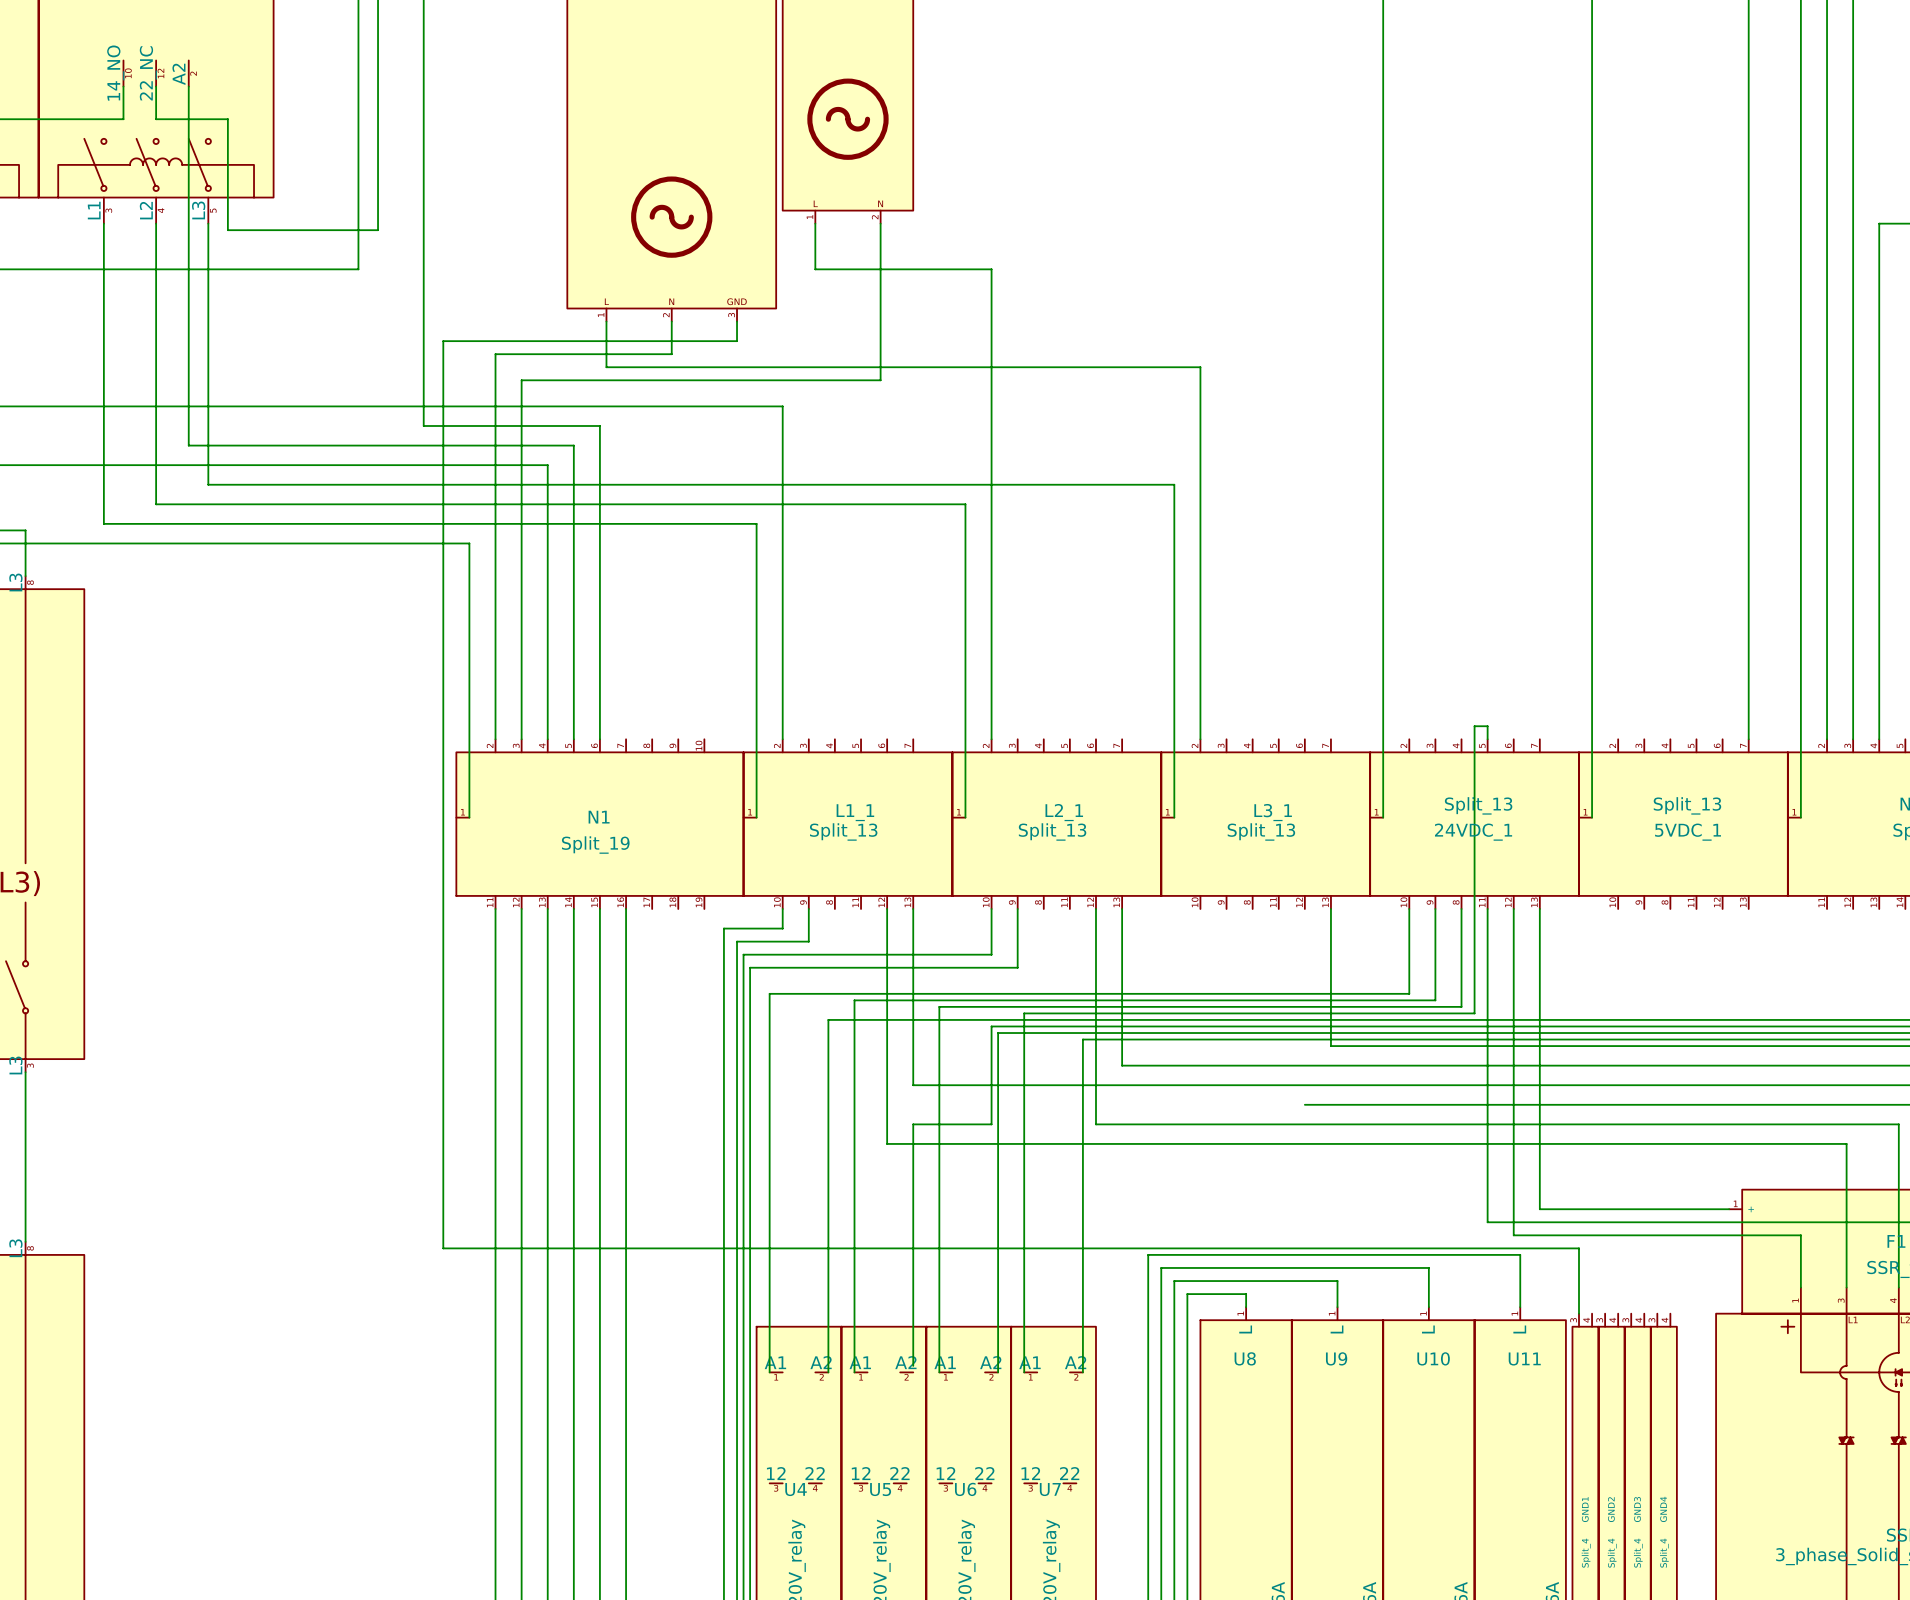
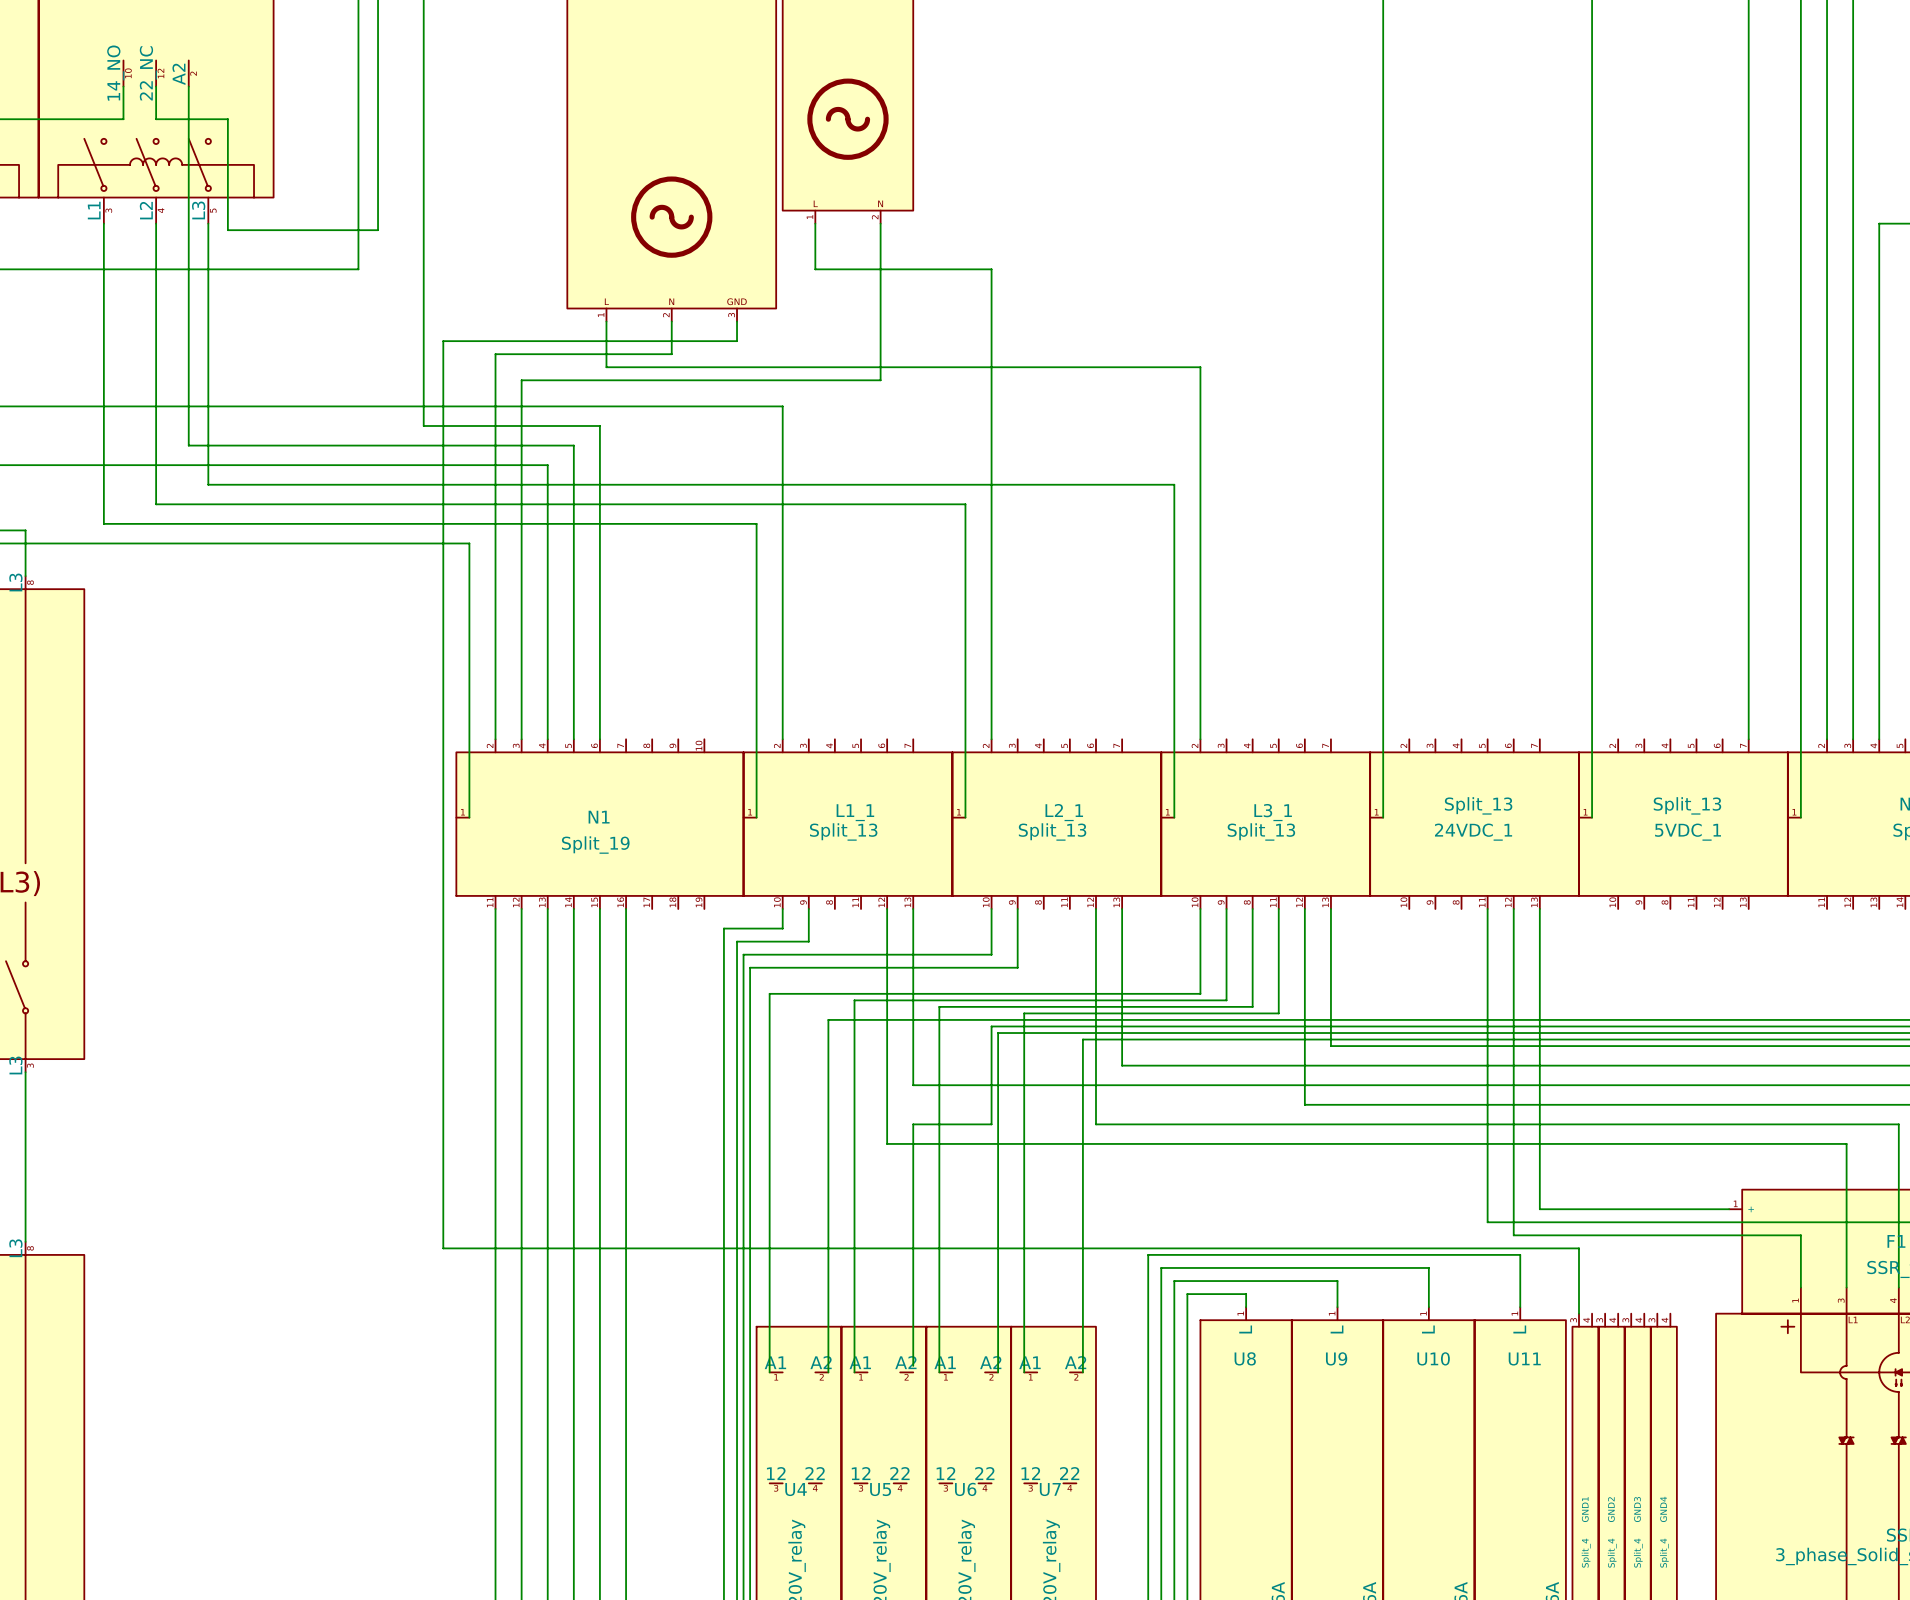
wire: (1487, 739) (1487, 726) (1474, 726) (1474, 1013) (1278, 1013) -> (1278, 908) (1278, 1013)
wire: none -> (1304, 908) (1304, 1104)
wire: (1409, 908) (1409, 993) (1200, 993) -> (1200, 908) (1200, 993)
wire: (1435, 908) (1435, 1000) (1226, 1000) -> (1226, 908) (1226, 1000)
wire: (1461, 908) (1461, 1006) (1252, 1006) -> (1252, 908) (1252, 1006)

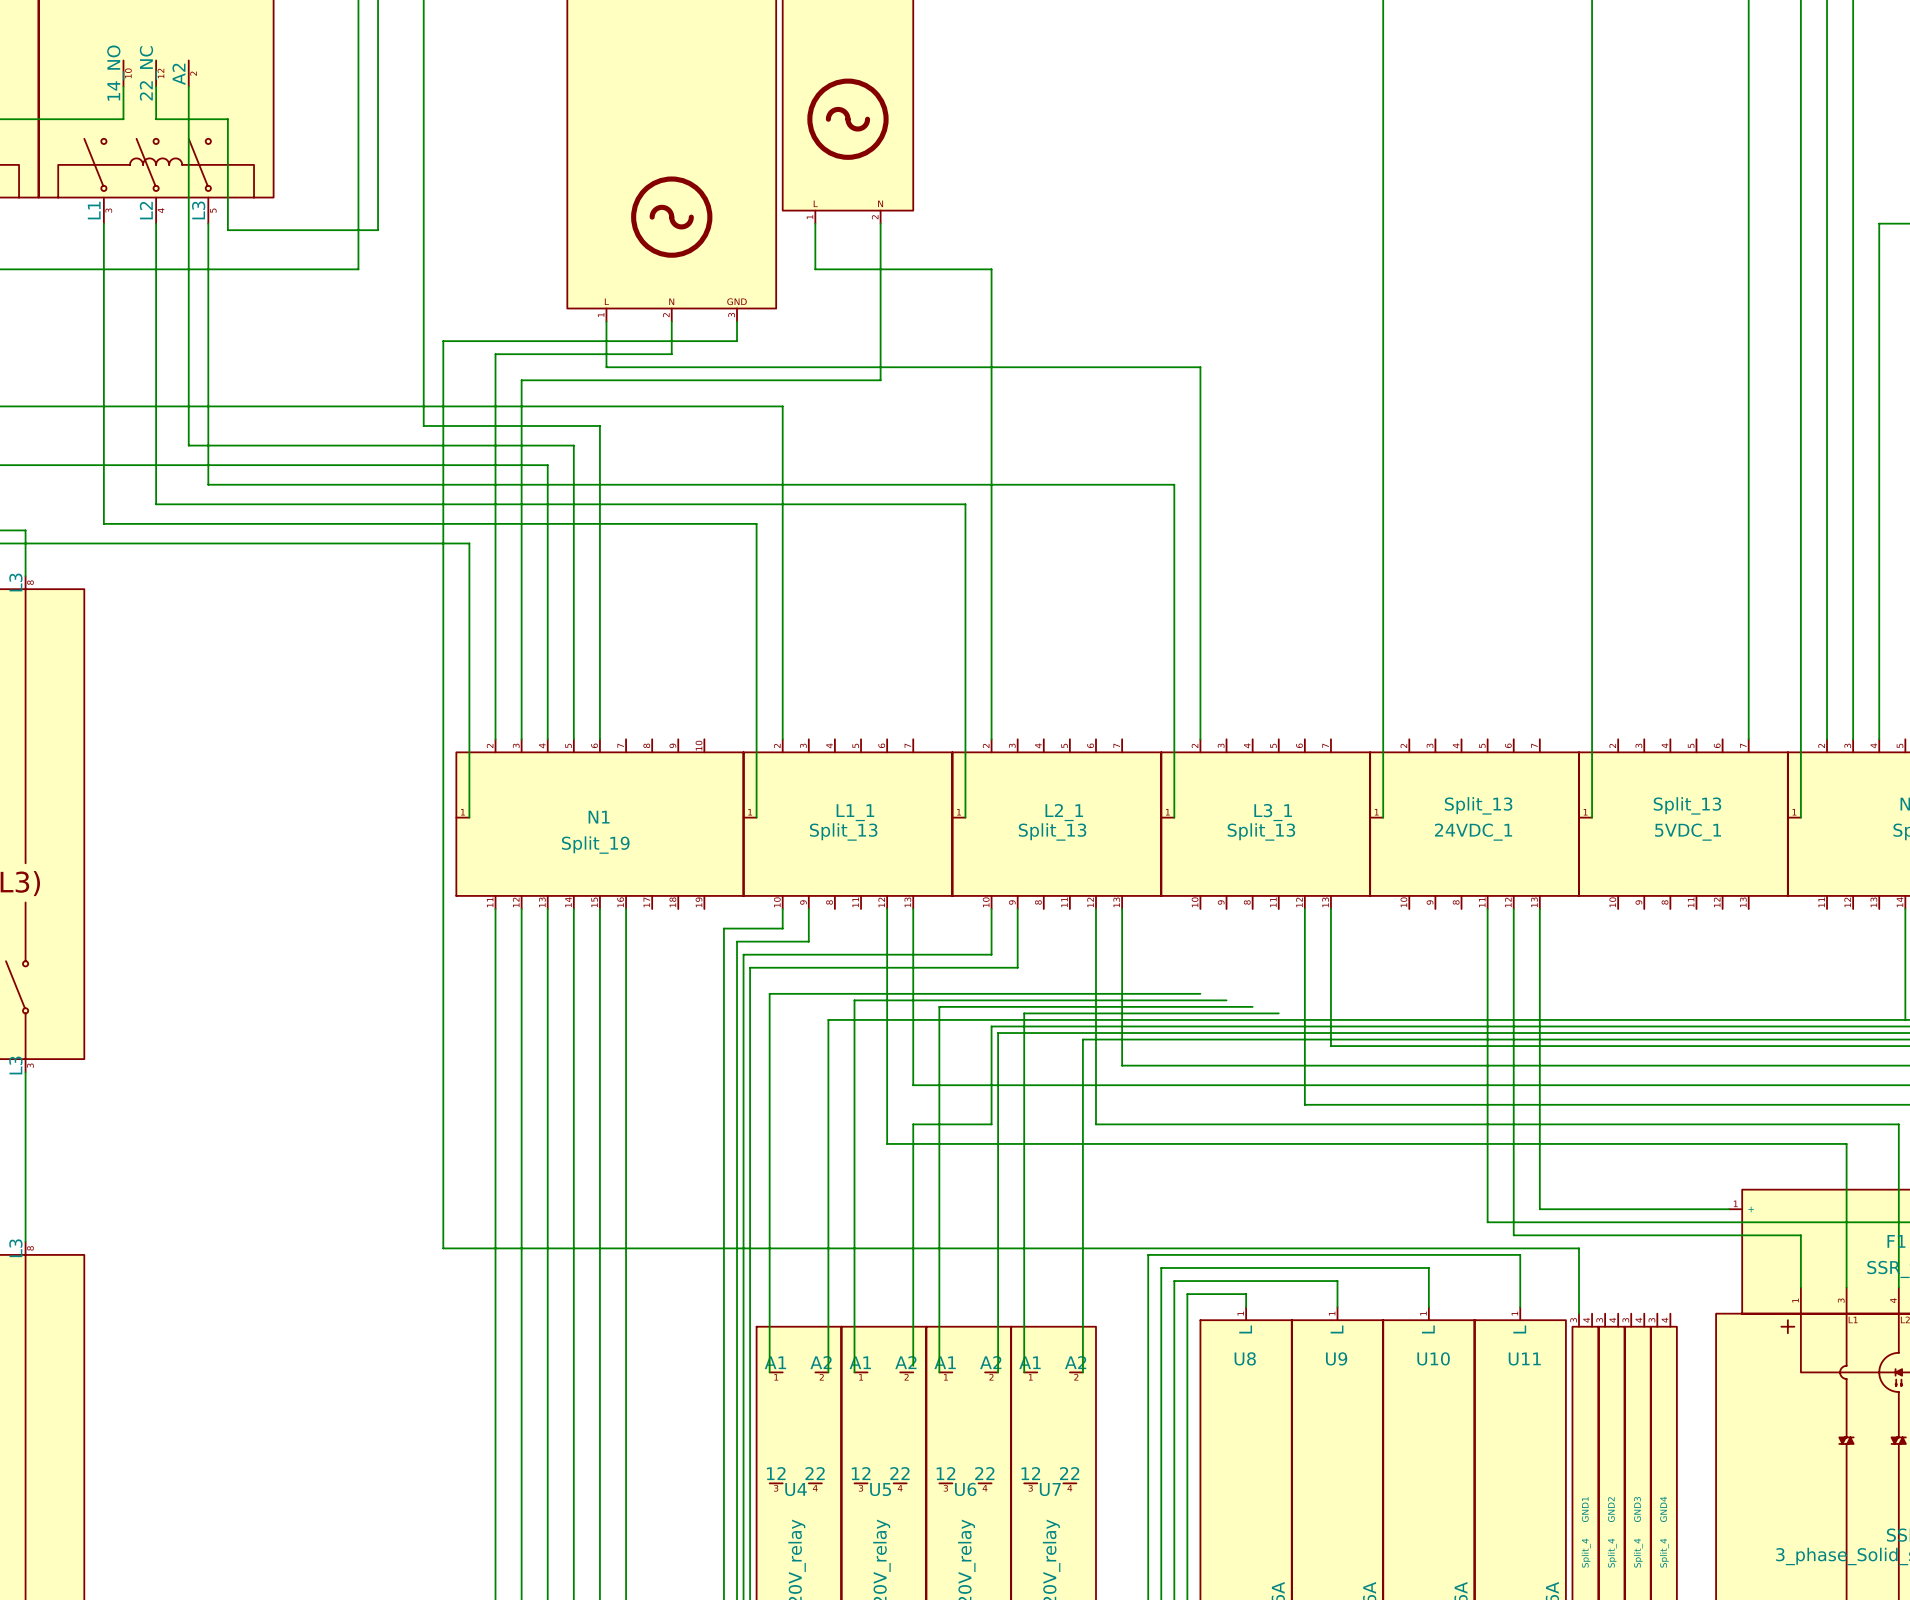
wire: (1200, 908) (1200, 993) -> none
wire: (1226, 908) (1226, 1000) -> none
wire: (1252, 908) (1252, 1006) -> none
wire: (1278, 908) (1278, 1013) -> none
wire: none -> (1905, 908) (1905, 1019)

